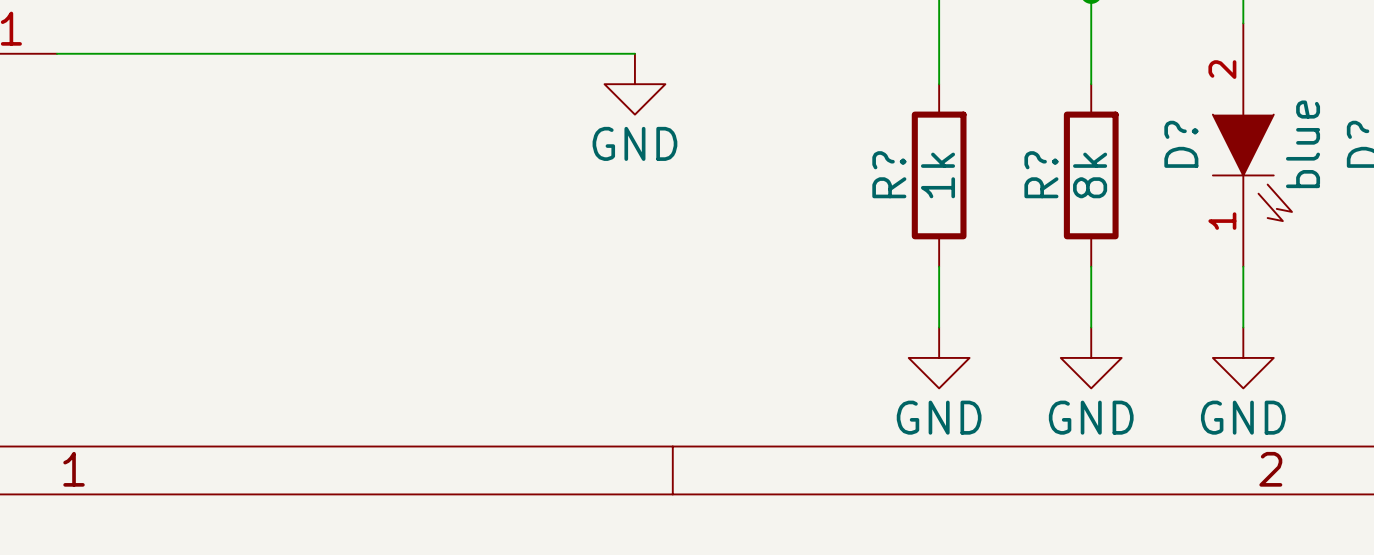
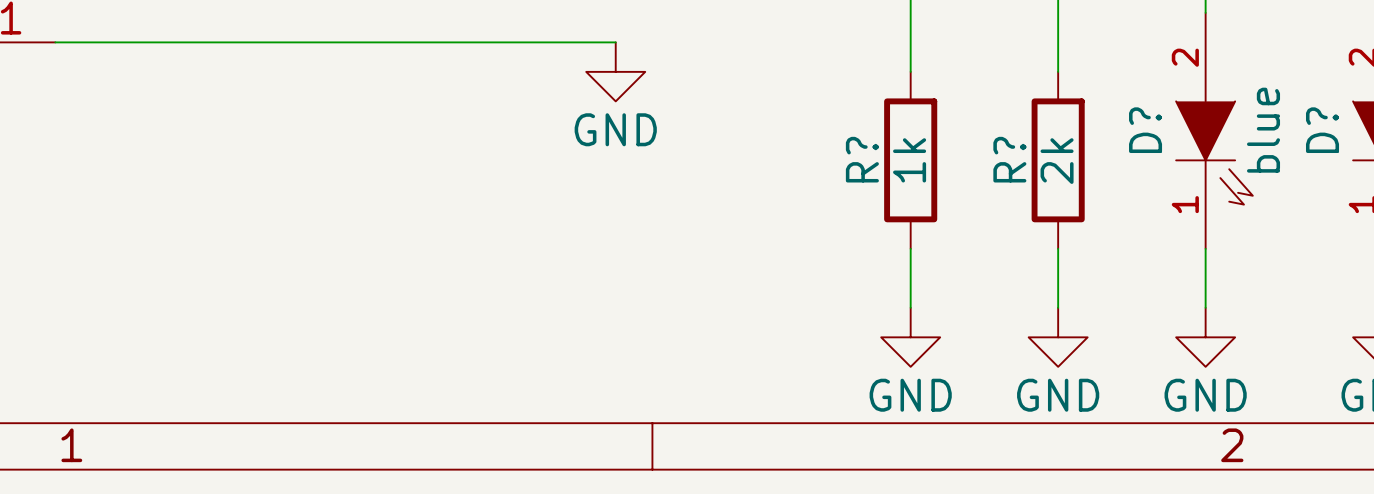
R? value: 8k (1090, 175) -> 2k (1057, 161)

